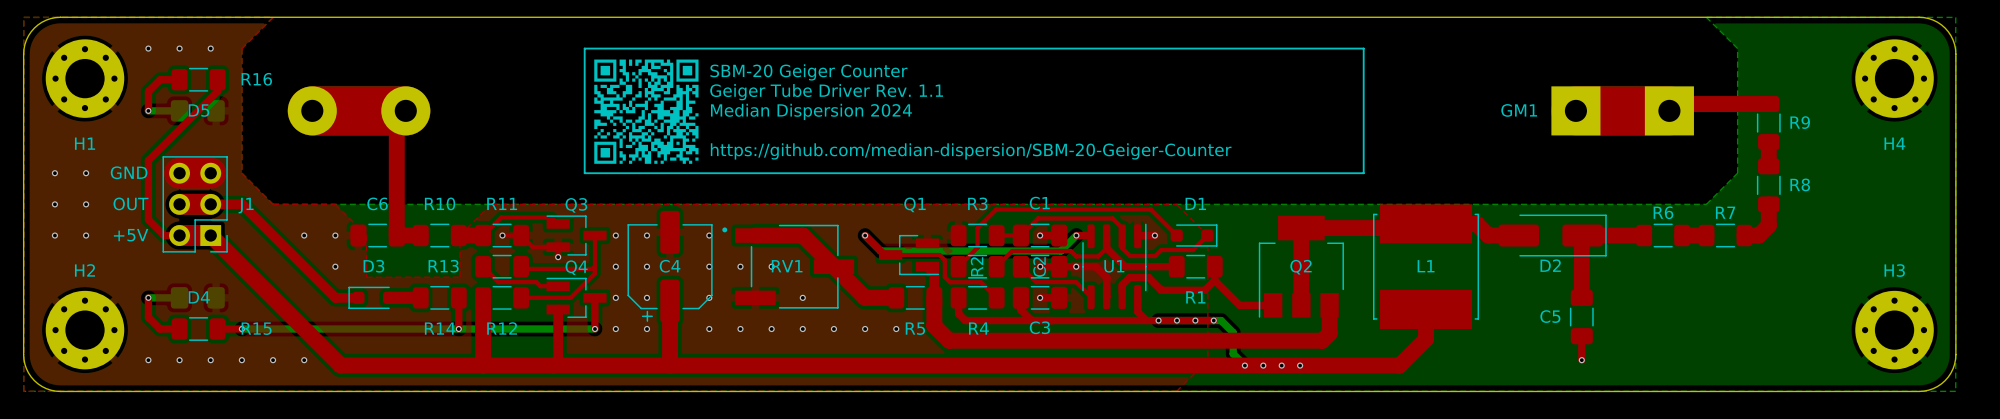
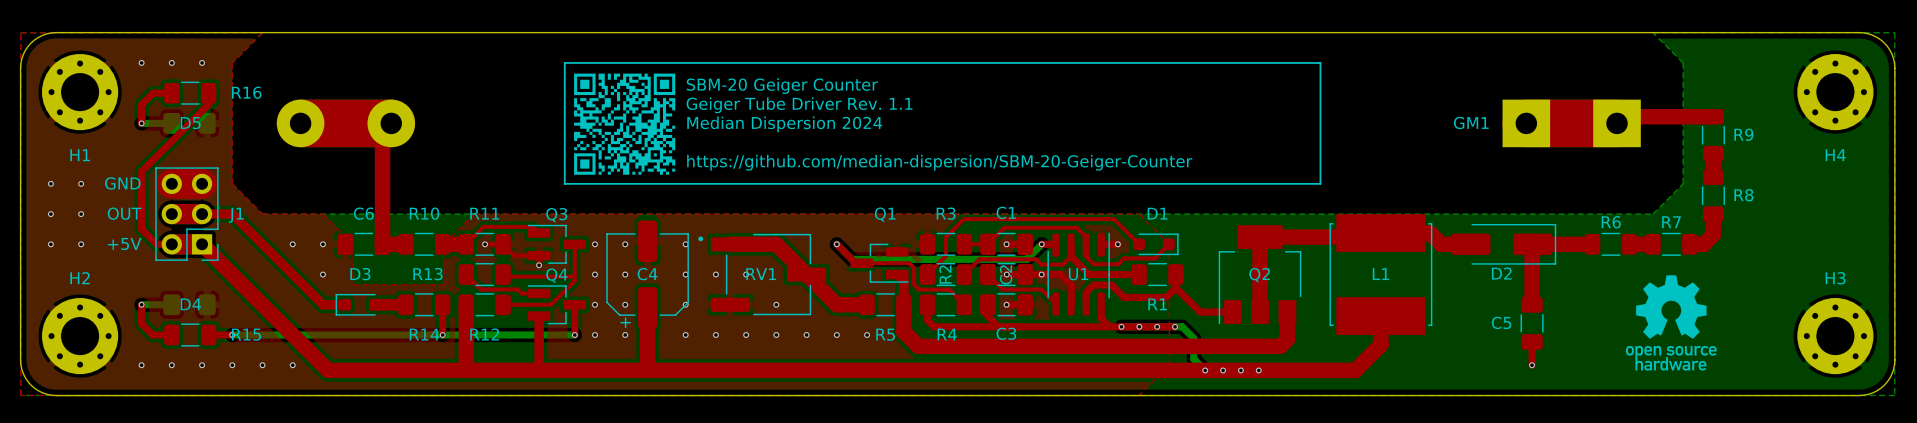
drawing: none -> [1626, 275, 1717, 371]

